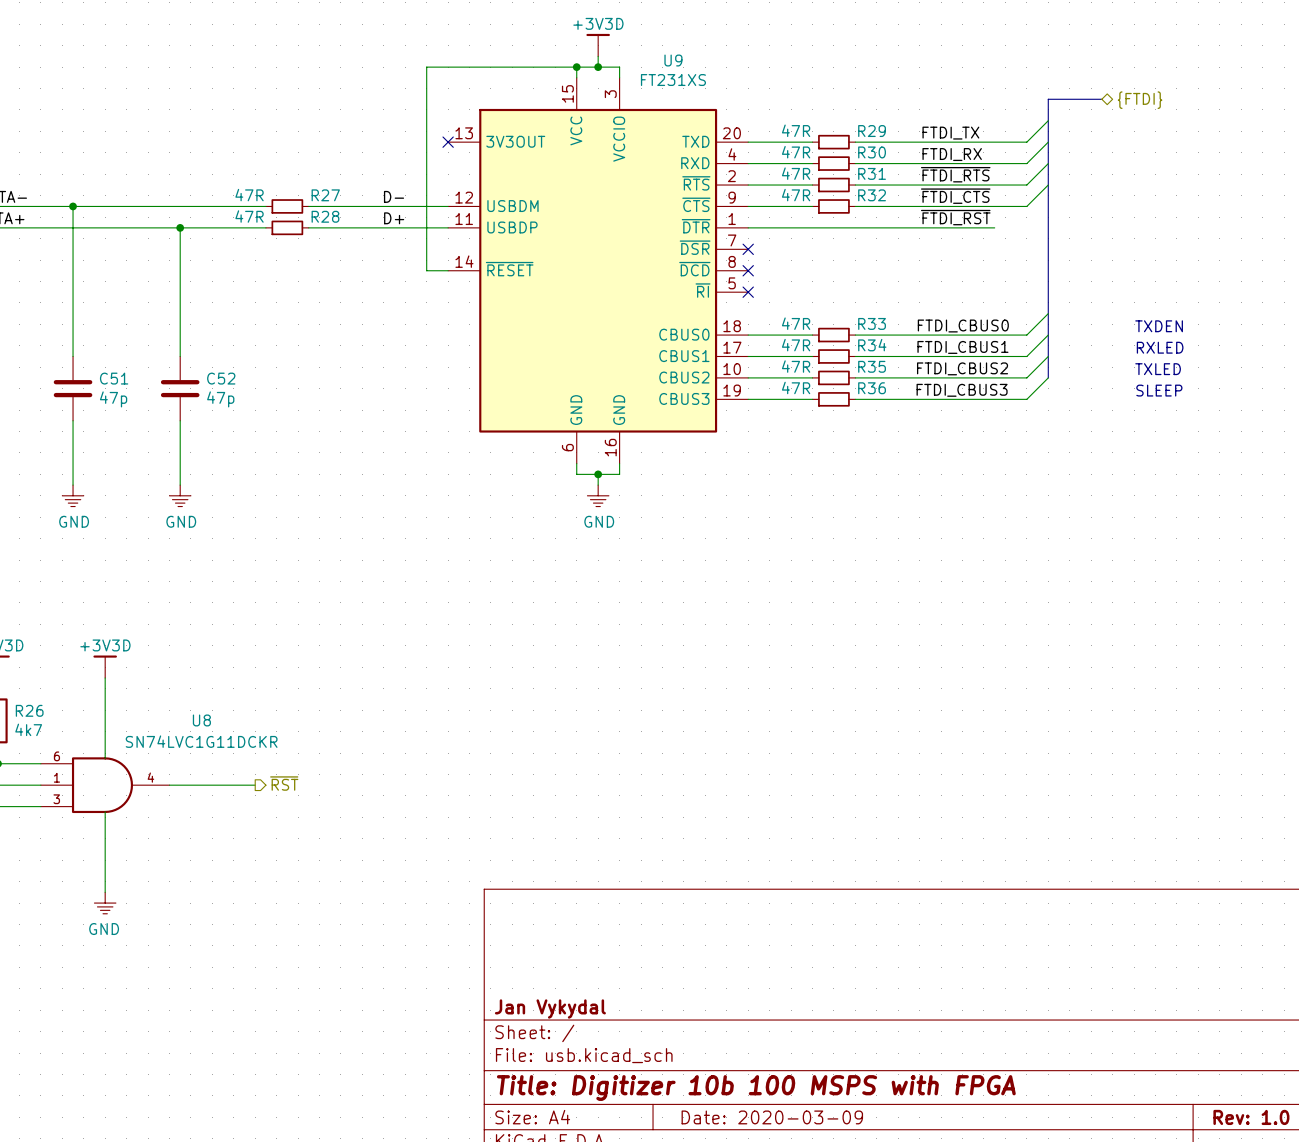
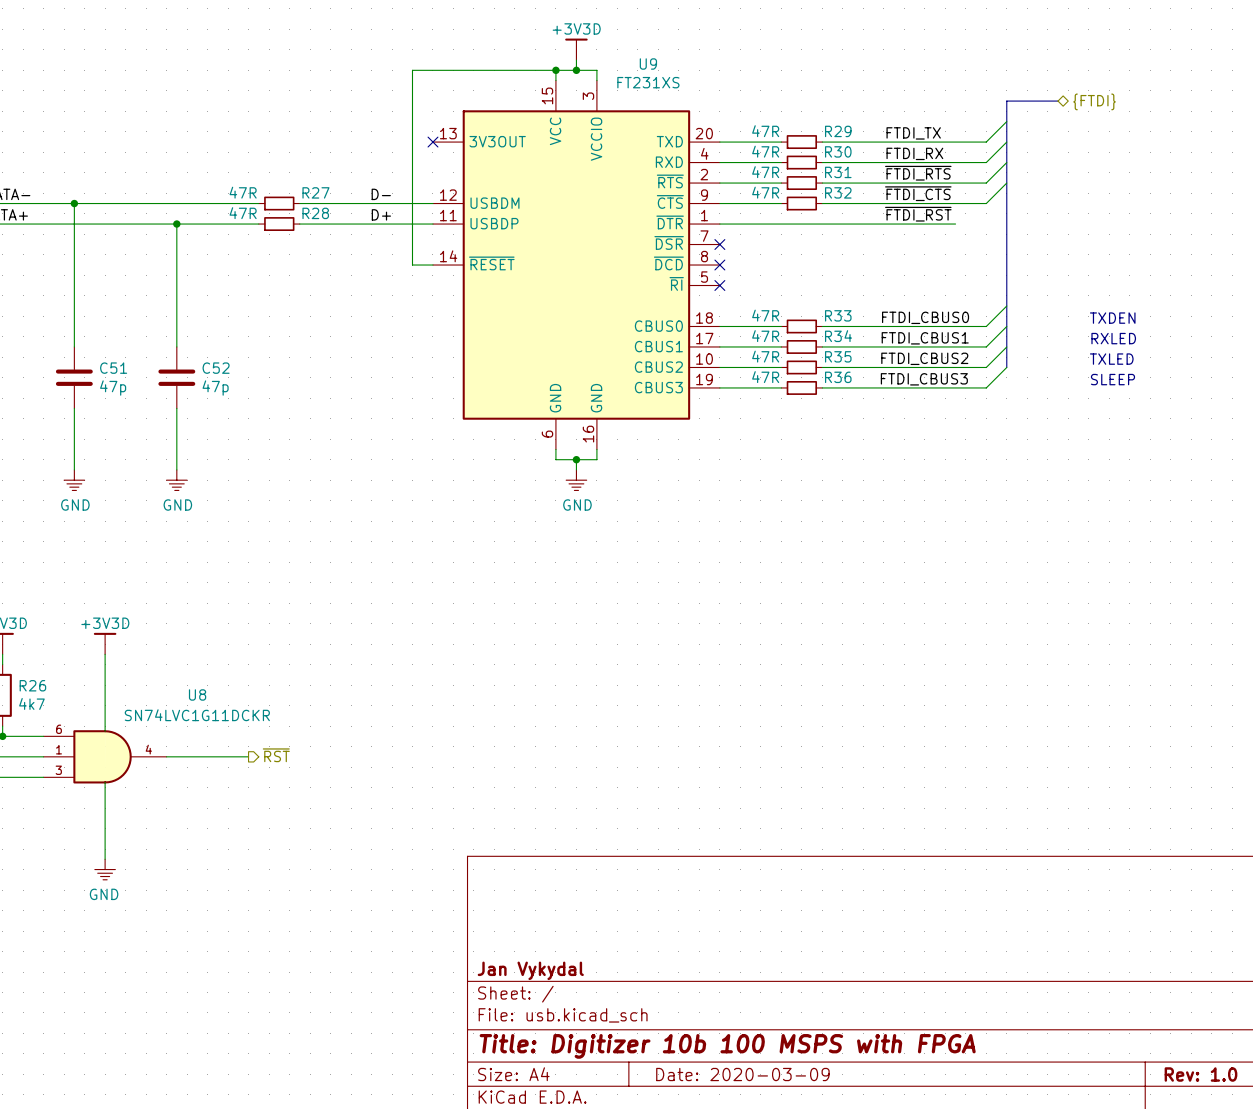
U8 symbol: [40, 757, 170, 814] -> [43, 730, 167, 784]

